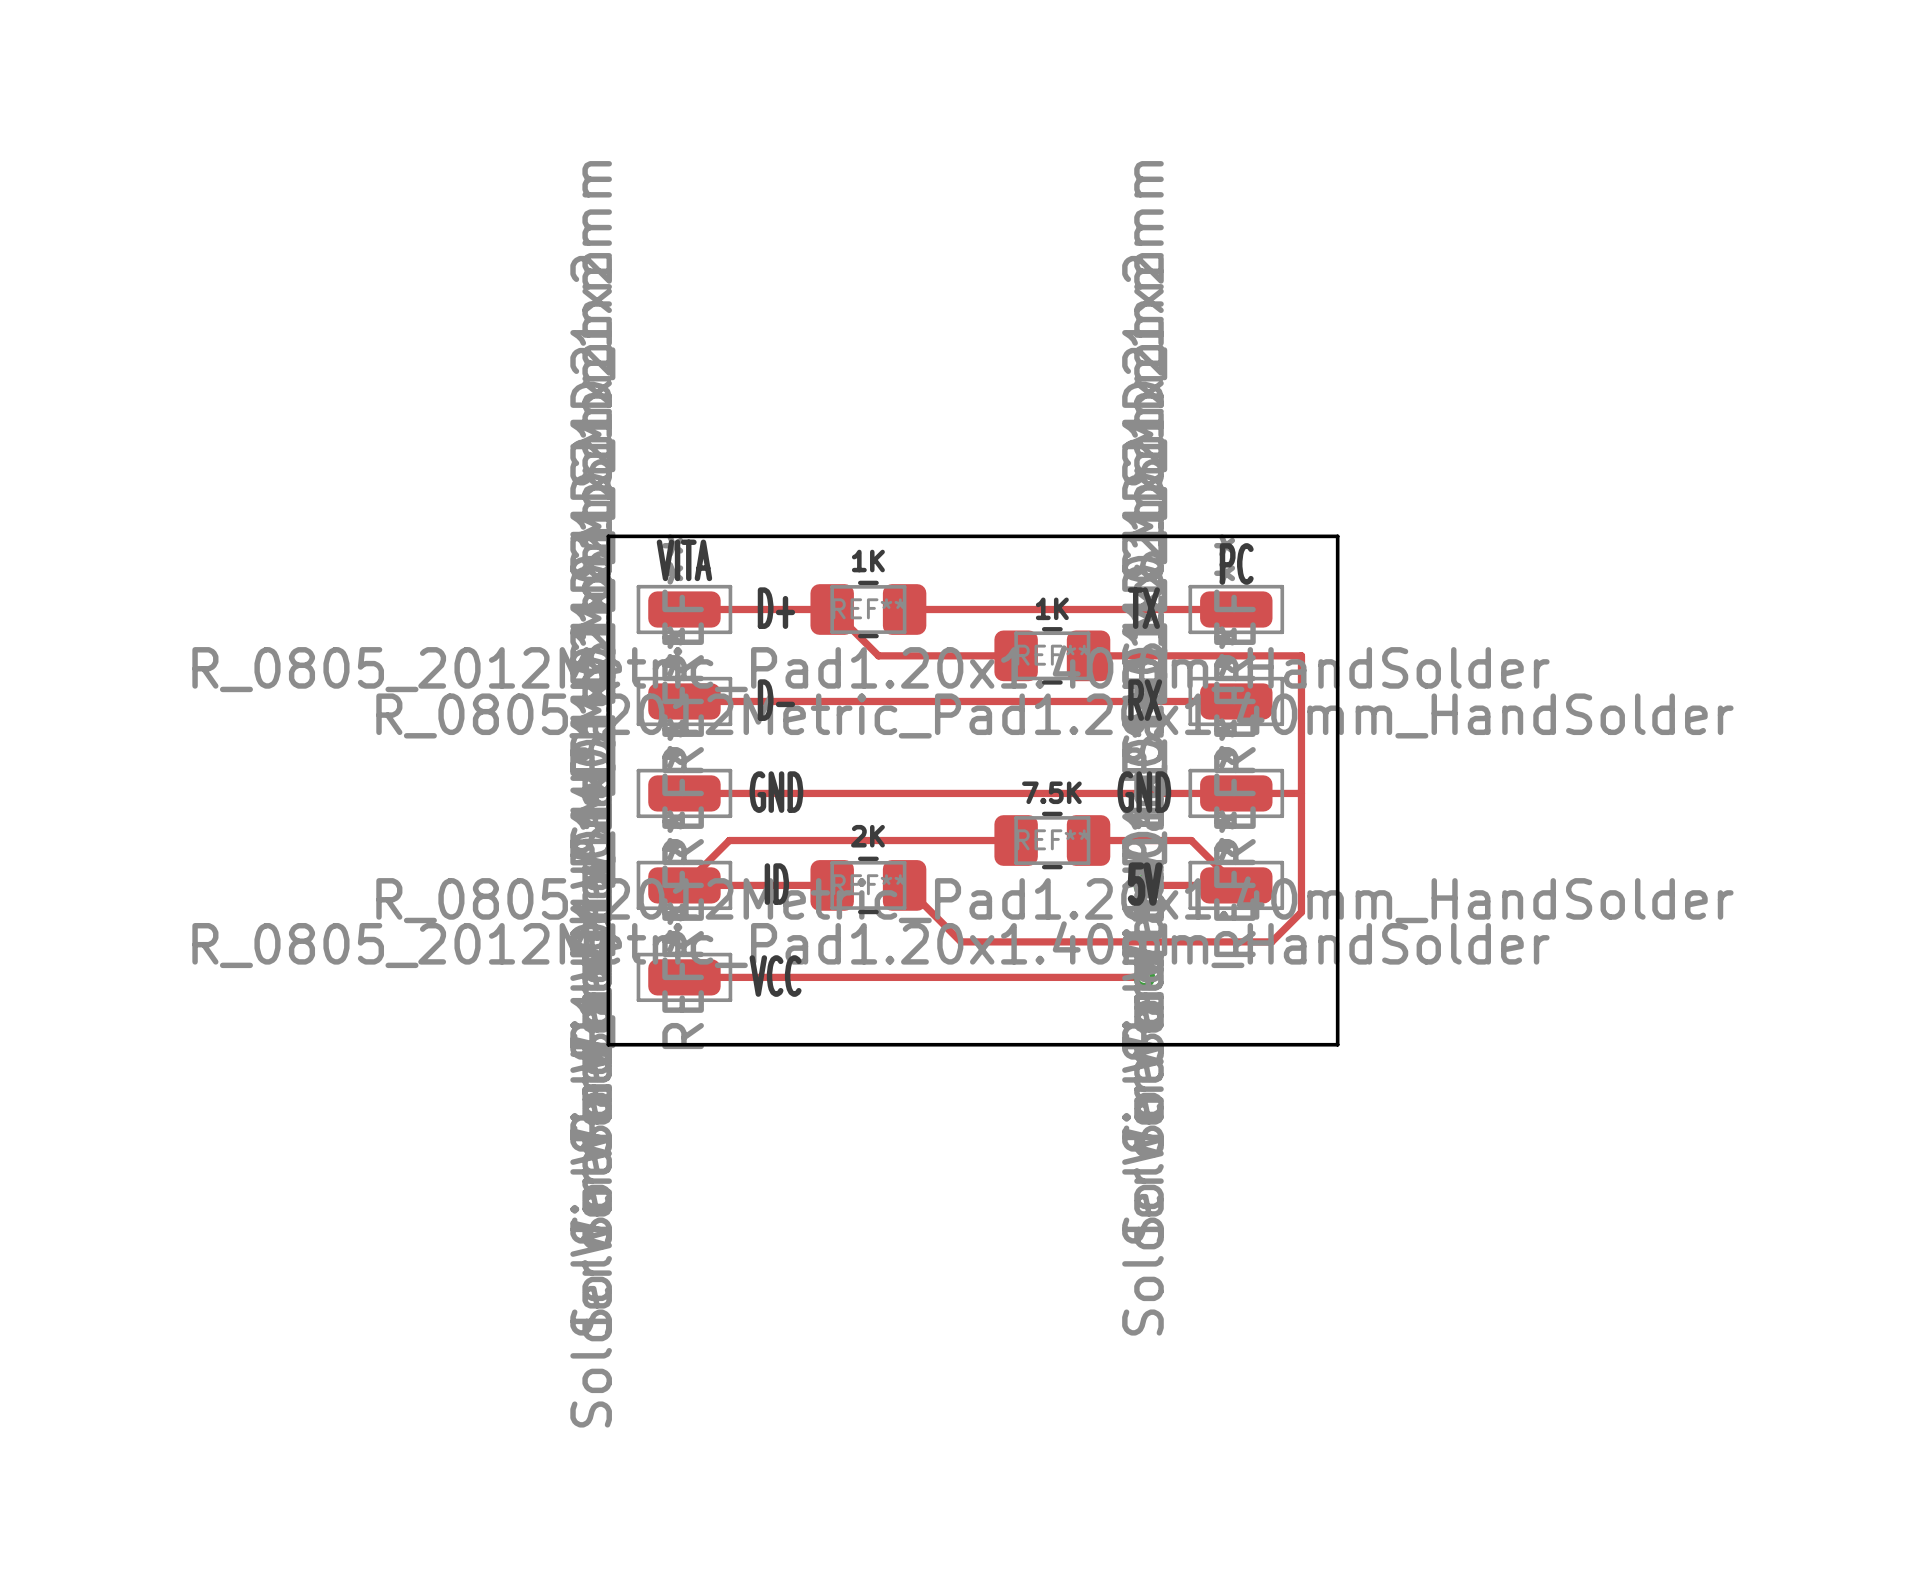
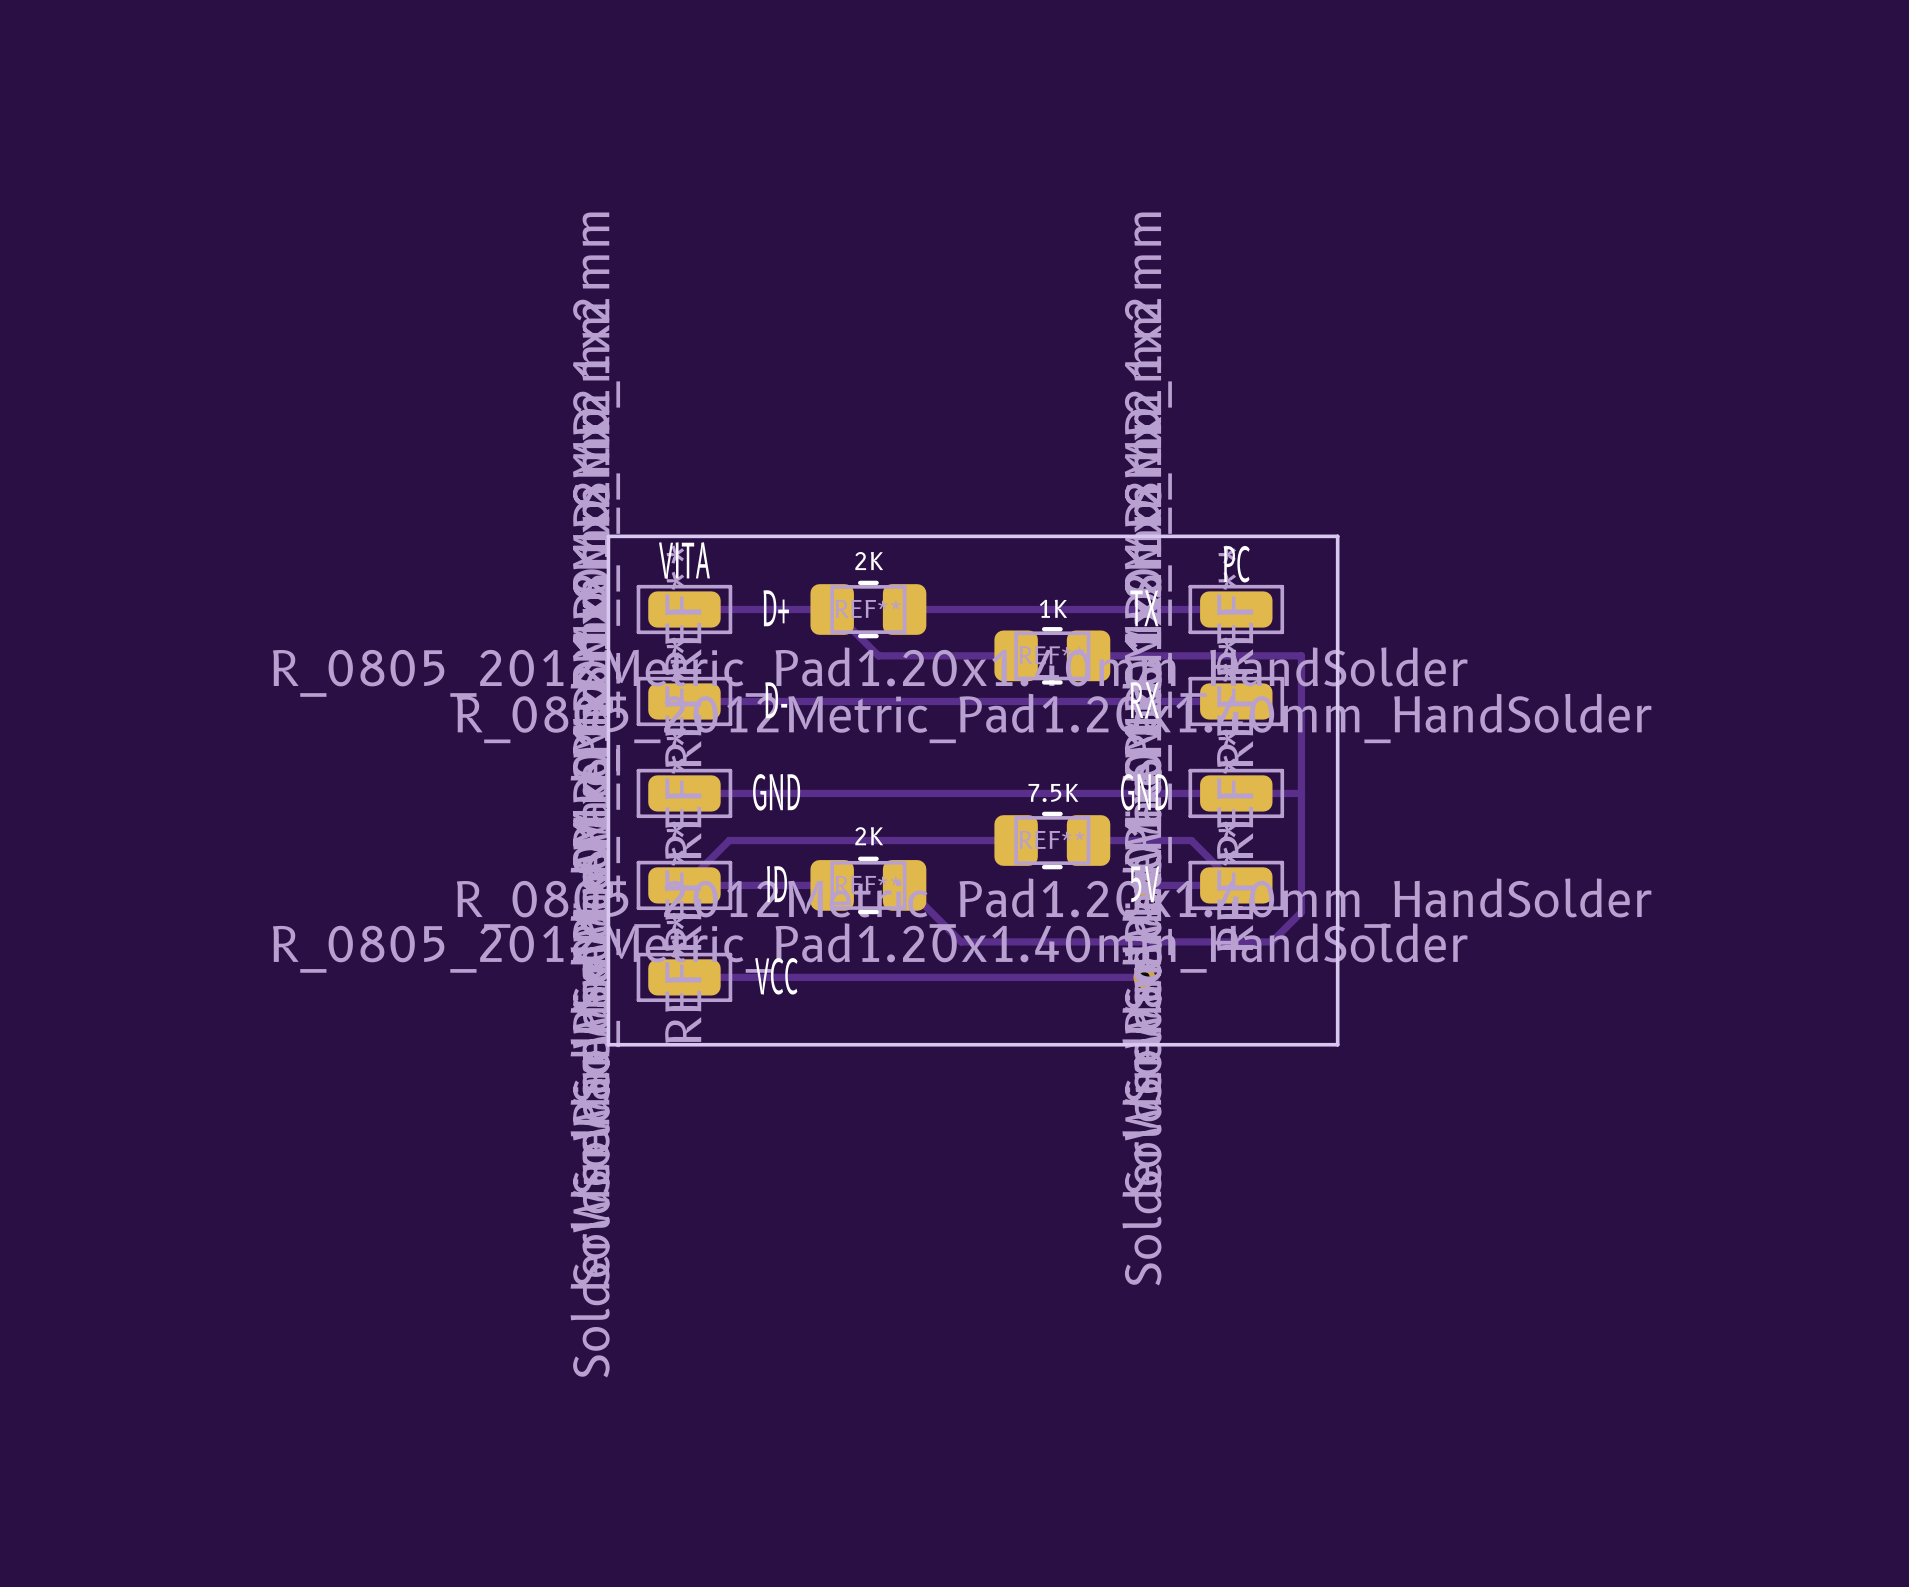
text: 1K (868, 561) -> 2K (869, 561)

